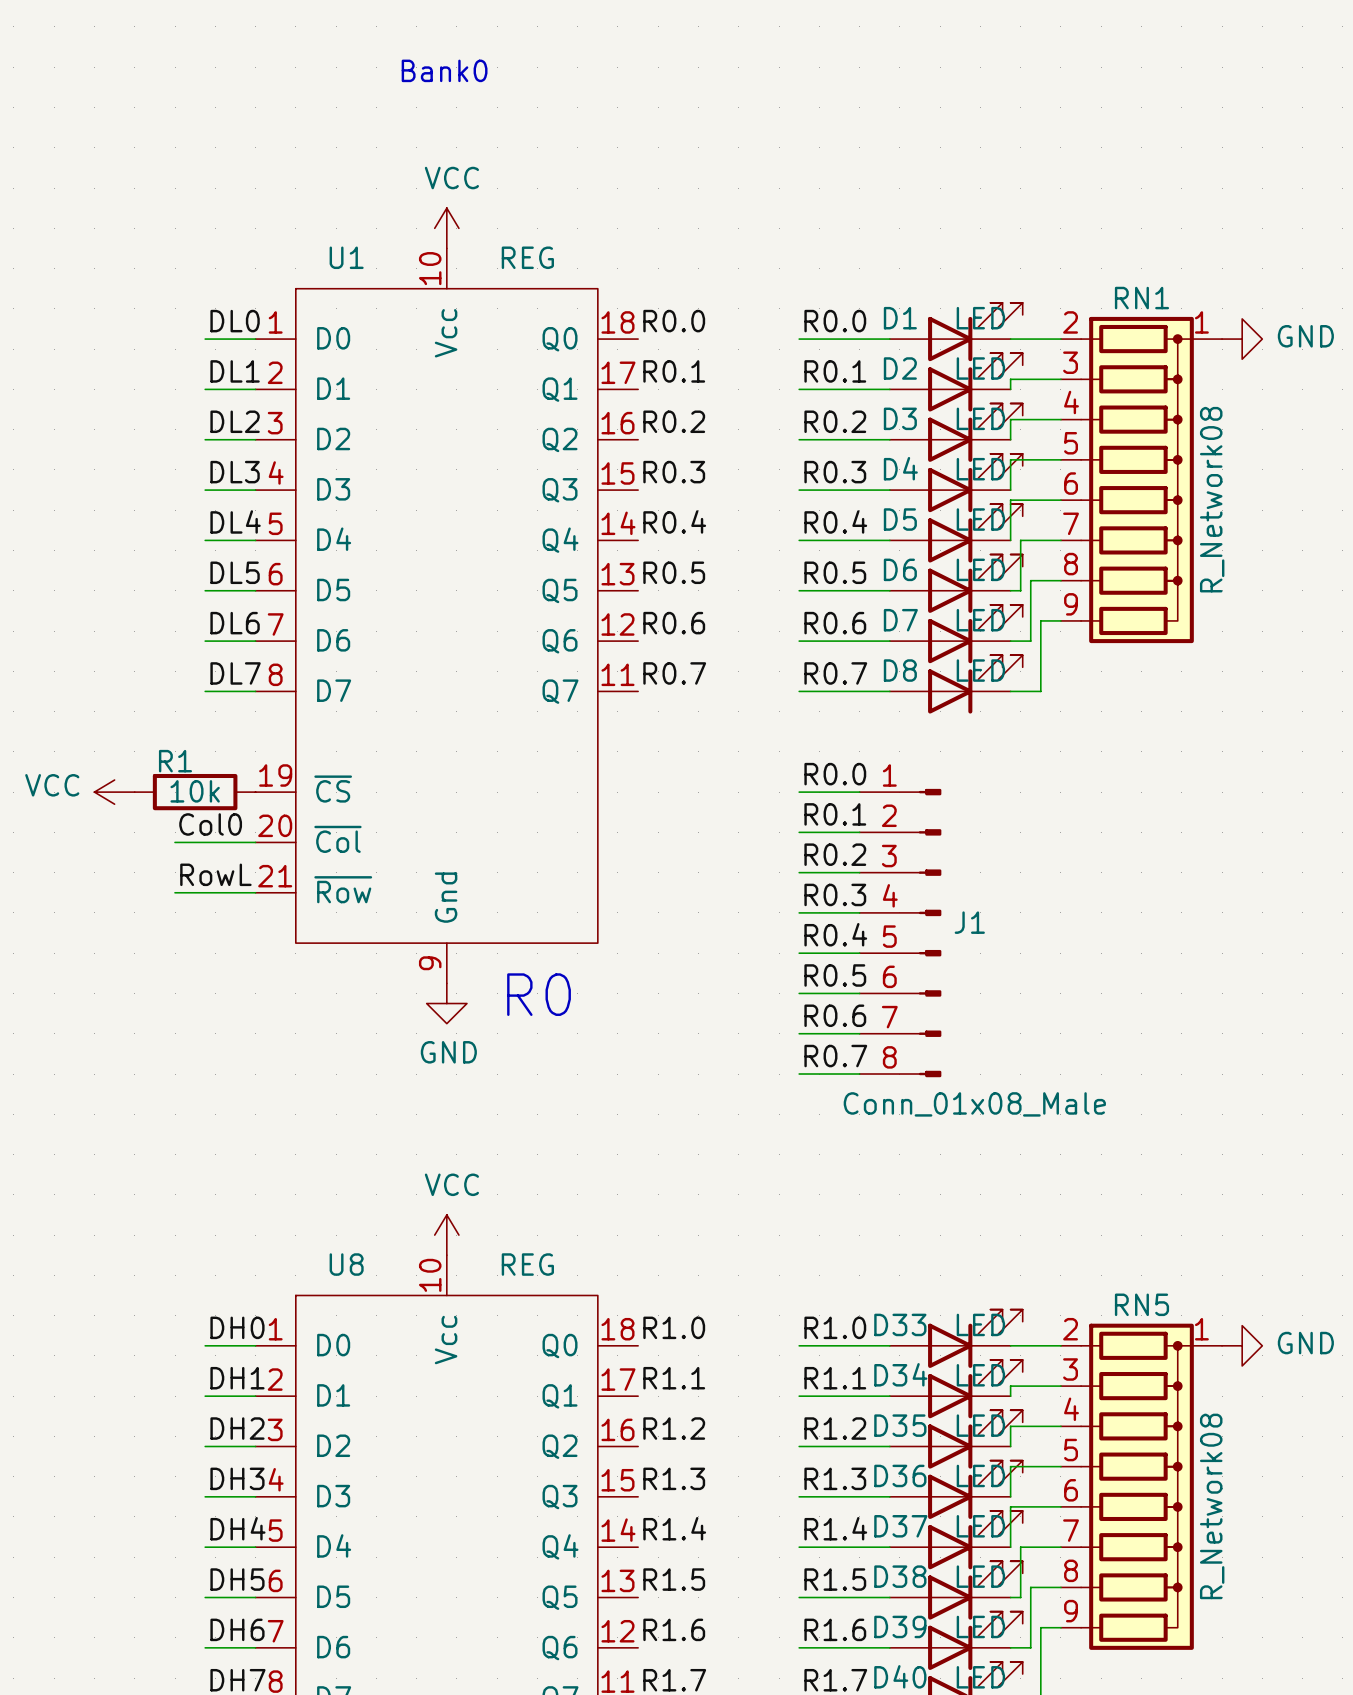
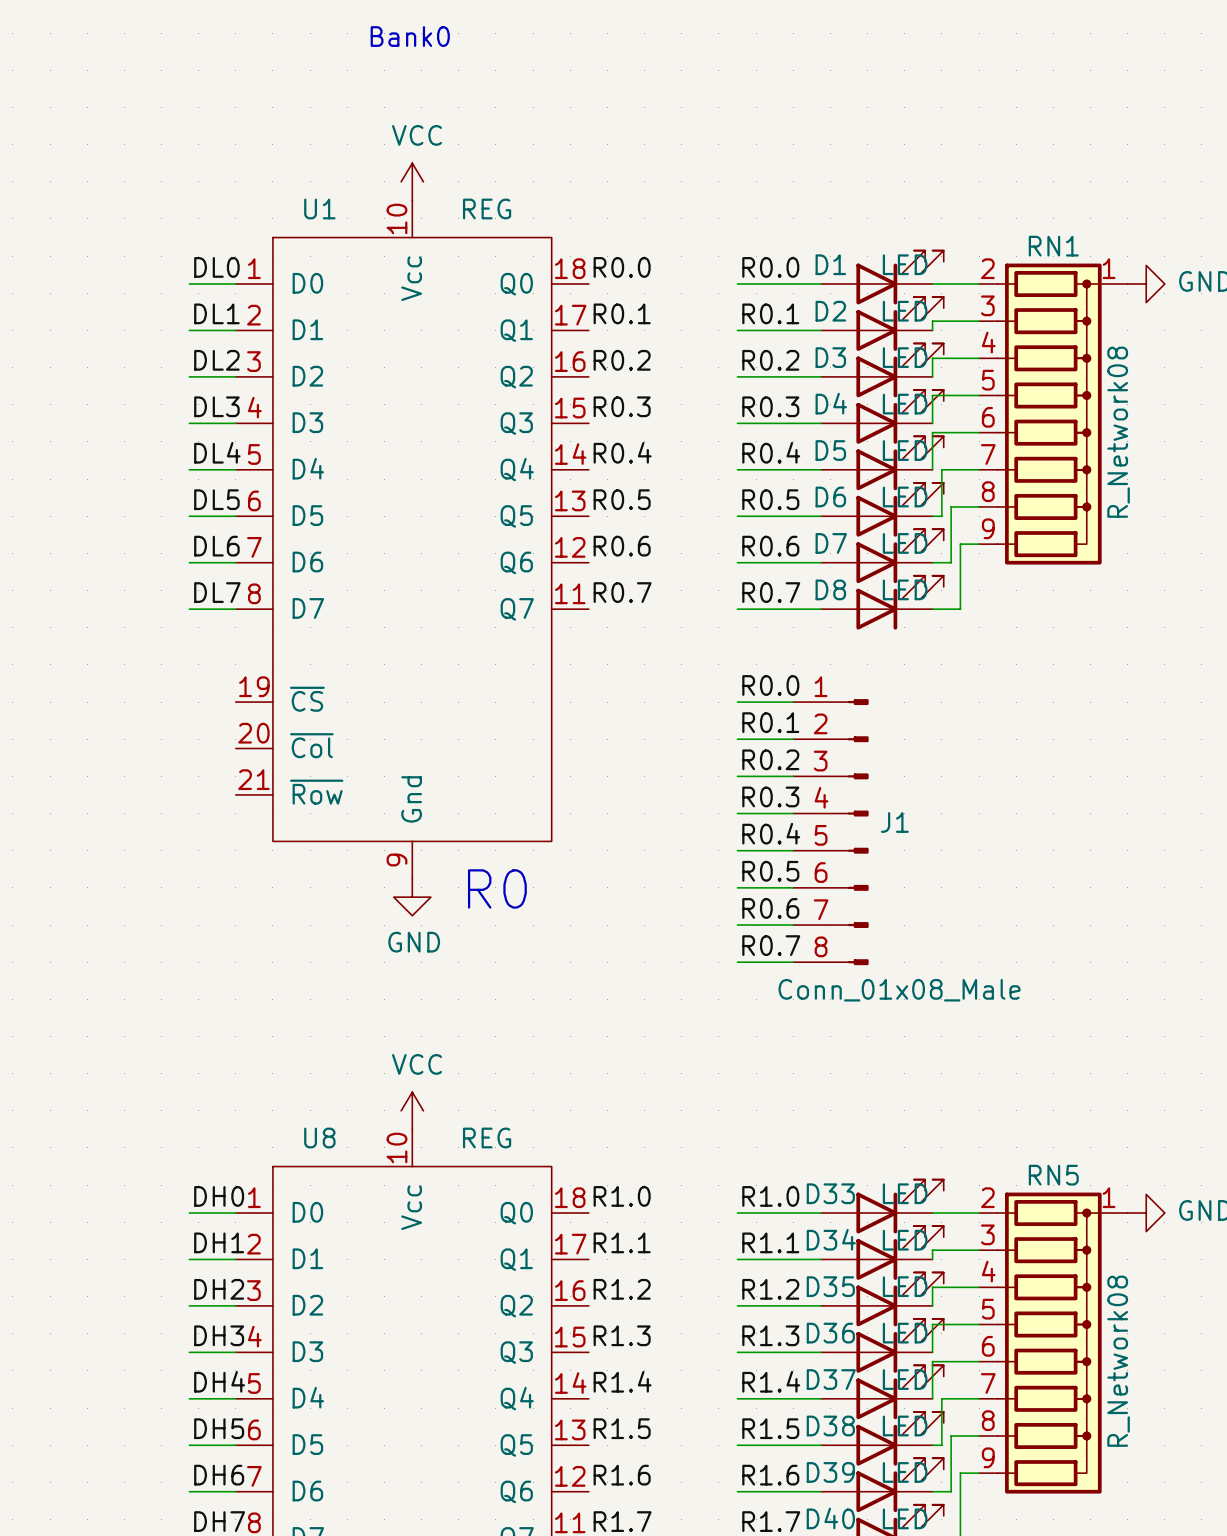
power symbol: VCC (114, 792) -> none
R1: 10k (195, 792) -> none
label: Col0 (210, 824) -> none
wire: (175, 842) (255, 842) -> none
label: RowL (215, 874) -> none
wire: (175, 892) (255, 892) -> none

